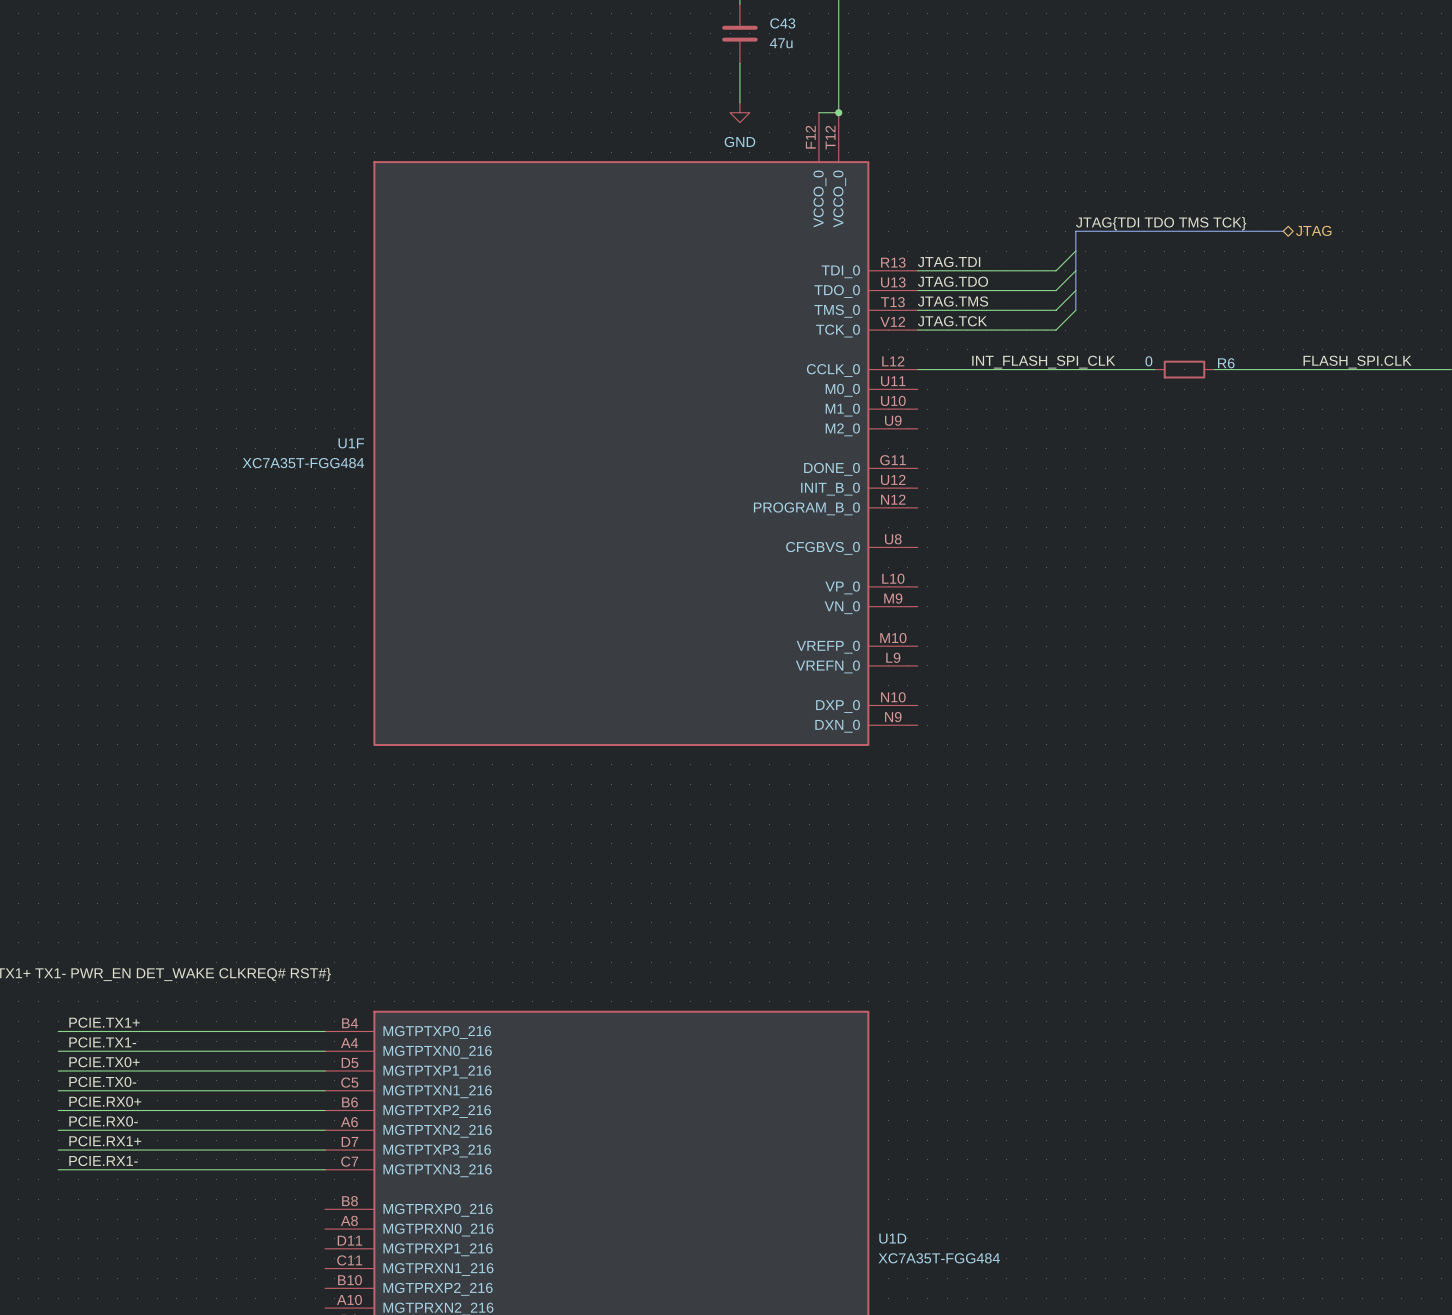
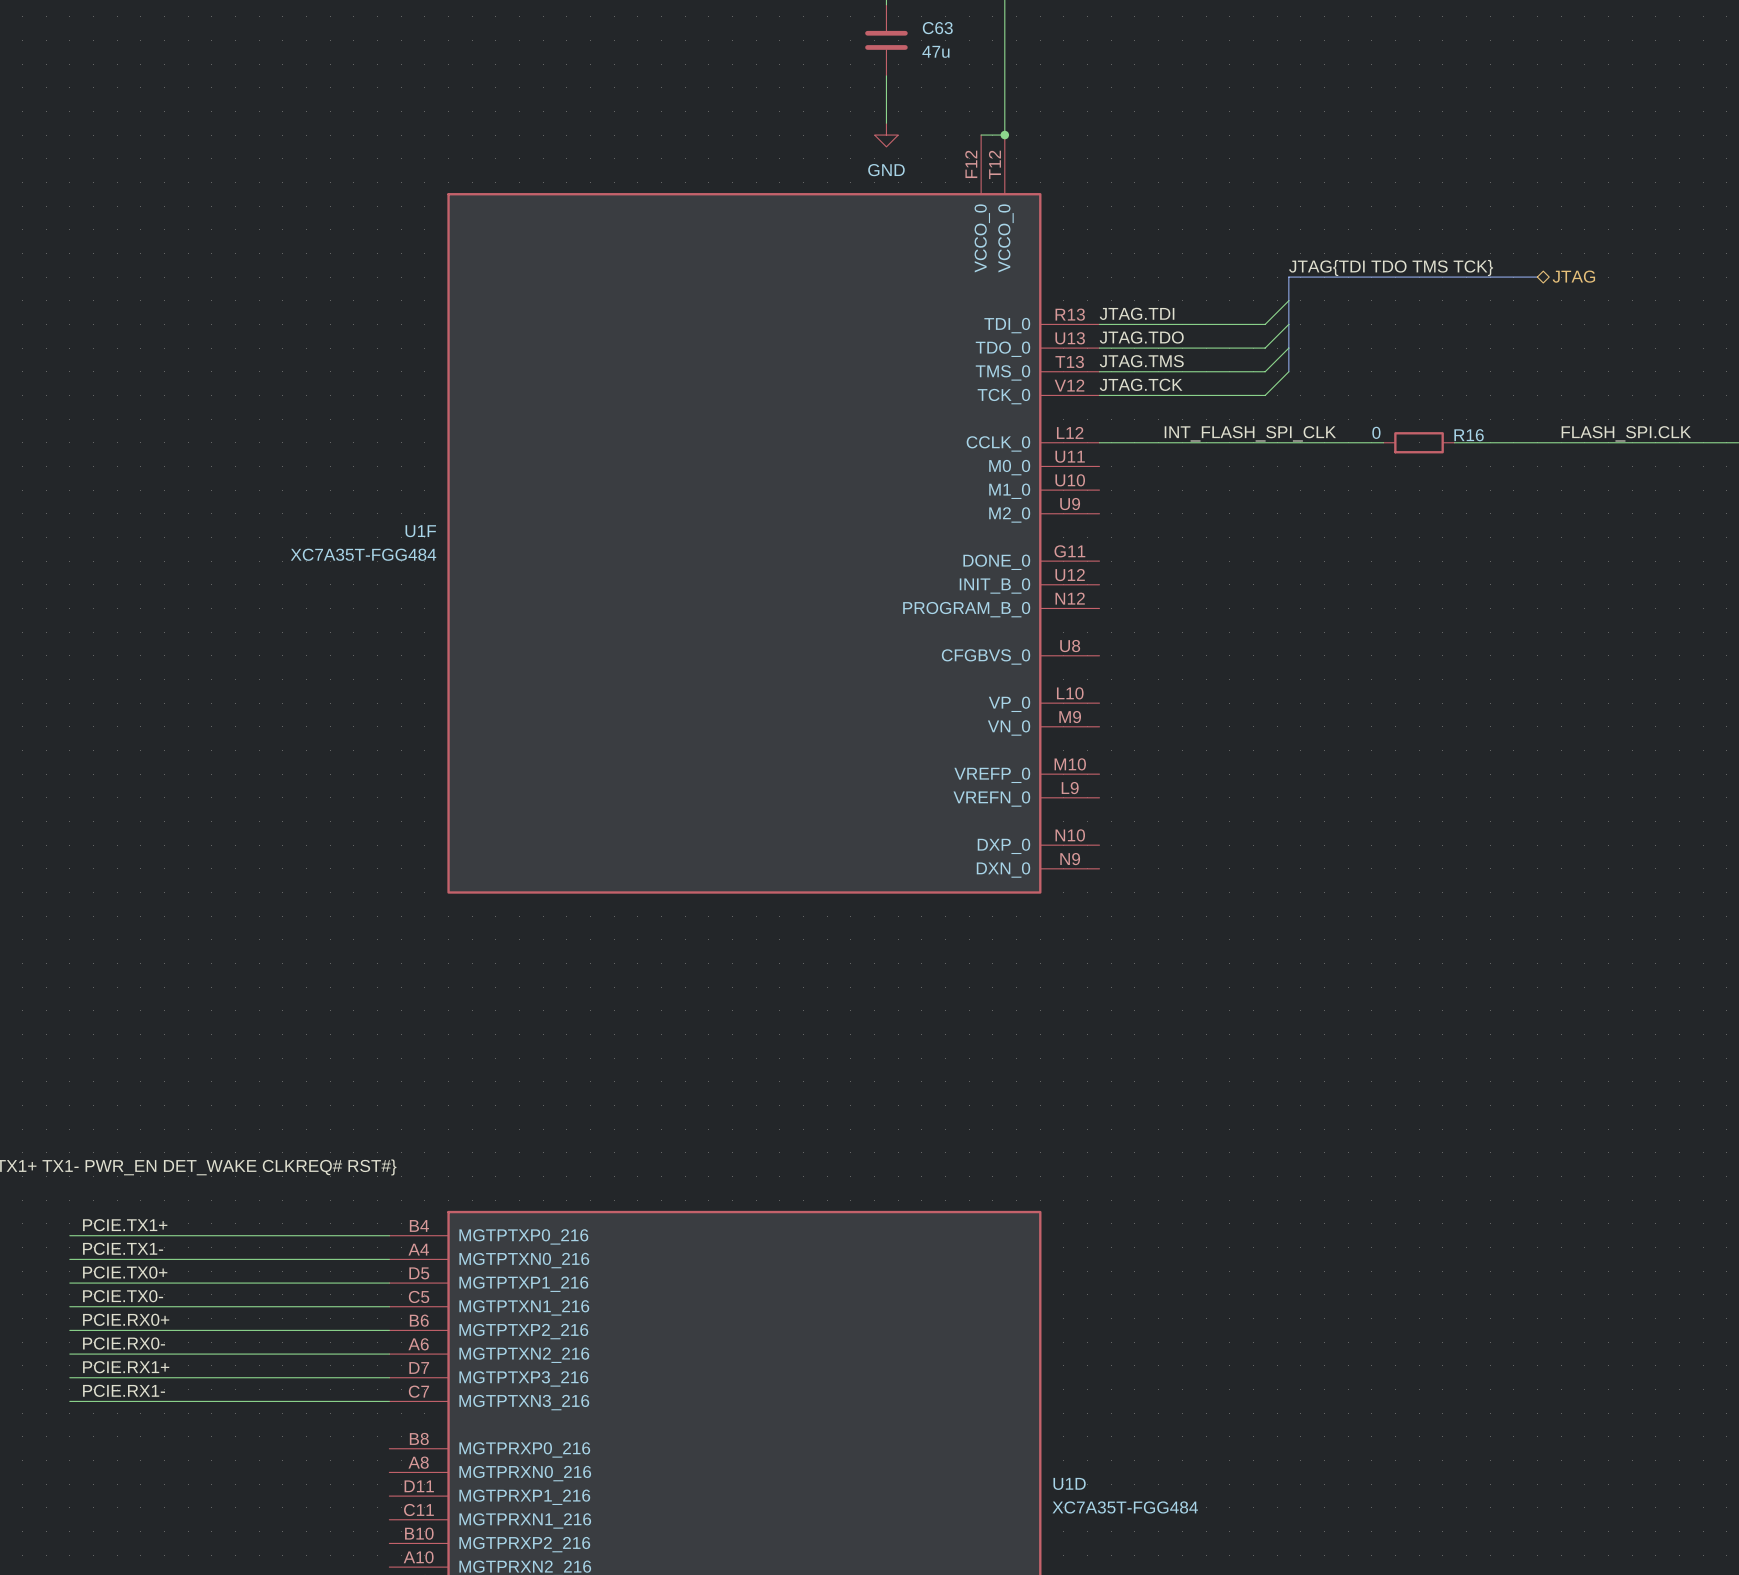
C43 name: C43 (782, 23) -> C63 (937, 28)
R6 name: R6 (1226, 363) -> R16 (1469, 435)

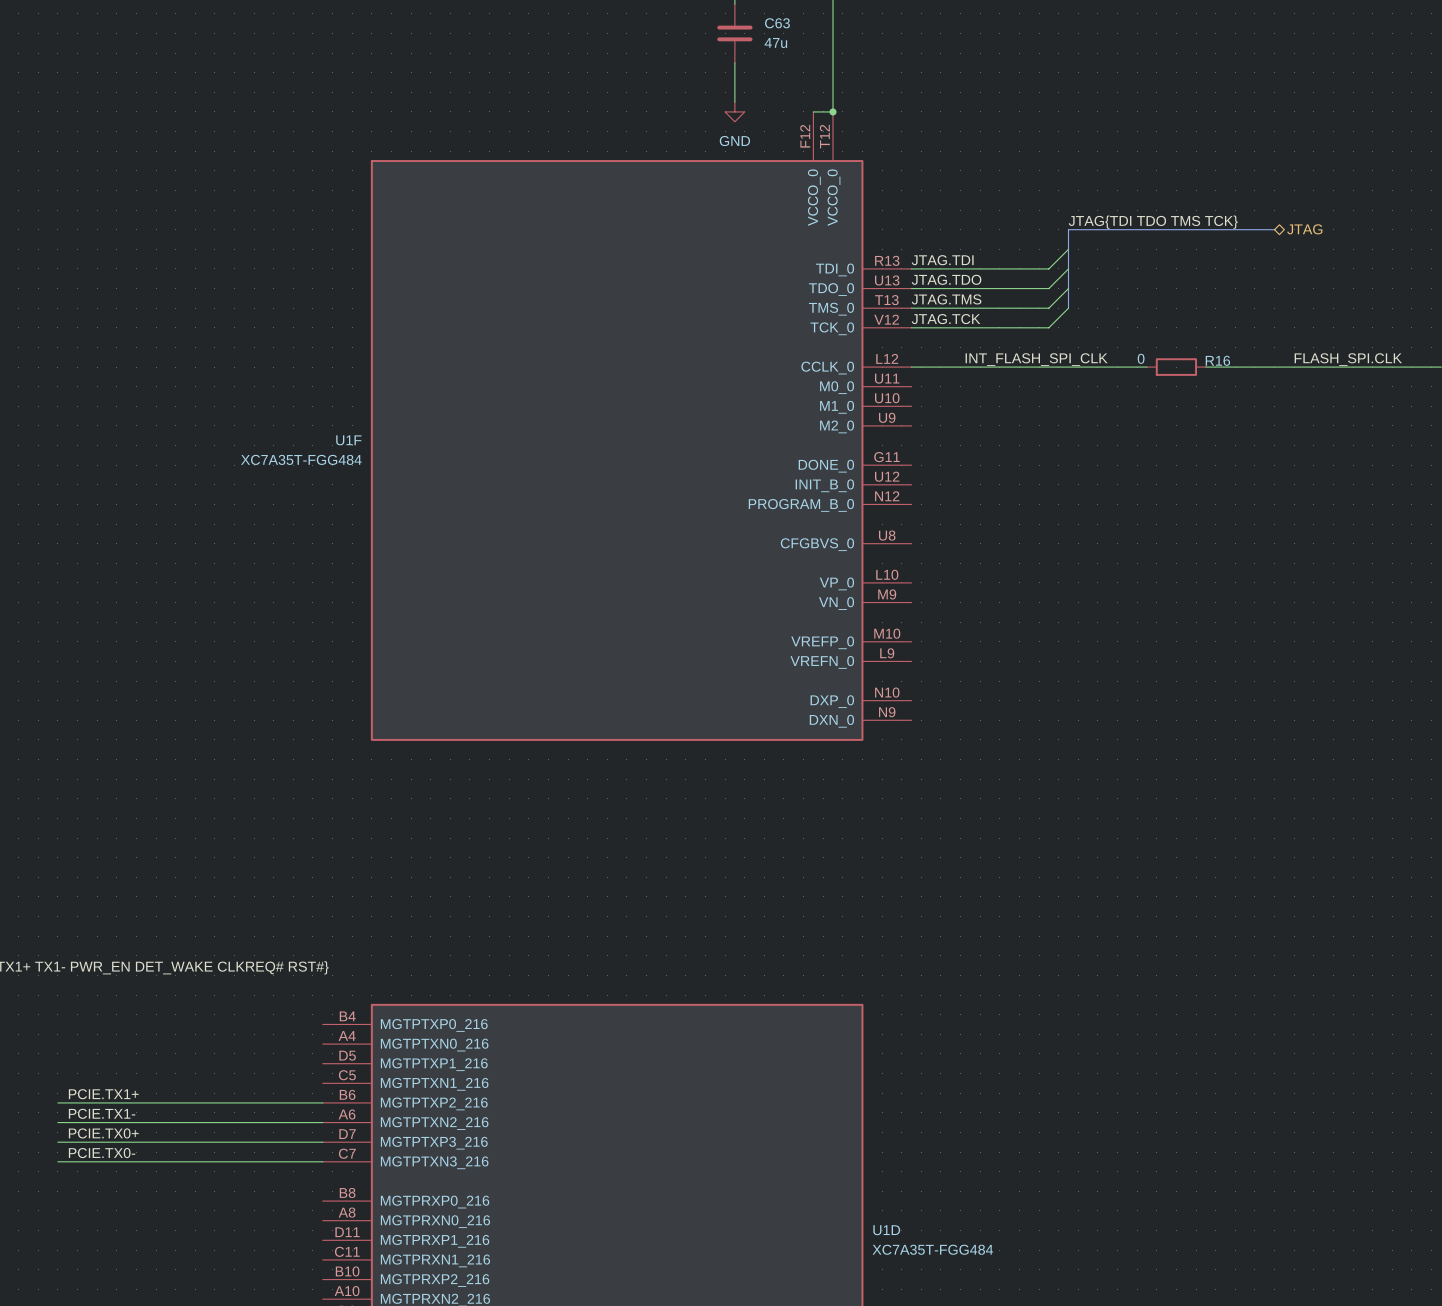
label: PCIE.TX1+ (125, 1225) -> none
wire: (69, 1235) (389, 1235) -> none
label: PCIE.TX1- (123, 1248) -> none
wire: (69, 1259) (389, 1259) -> none
label: PCIE.TX0+ (125, 1272) -> none
wire: (69, 1283) (389, 1283) -> none
label: PCIE.TX0- (123, 1296) -> none
wire: (69, 1306) (389, 1306) -> none
label: PCIE.RX0+ (126, 1319) -> PCIE.TX1+ (103, 1094)
label: PCIE.RX0- (124, 1343) -> PCIE.TX1- (102, 1113)
label: PCIE.RX1+ (126, 1367) -> PCIE.TX0+ (103, 1133)
label: PCIE.RX1- (124, 1390) -> PCIE.TX0- (102, 1153)

